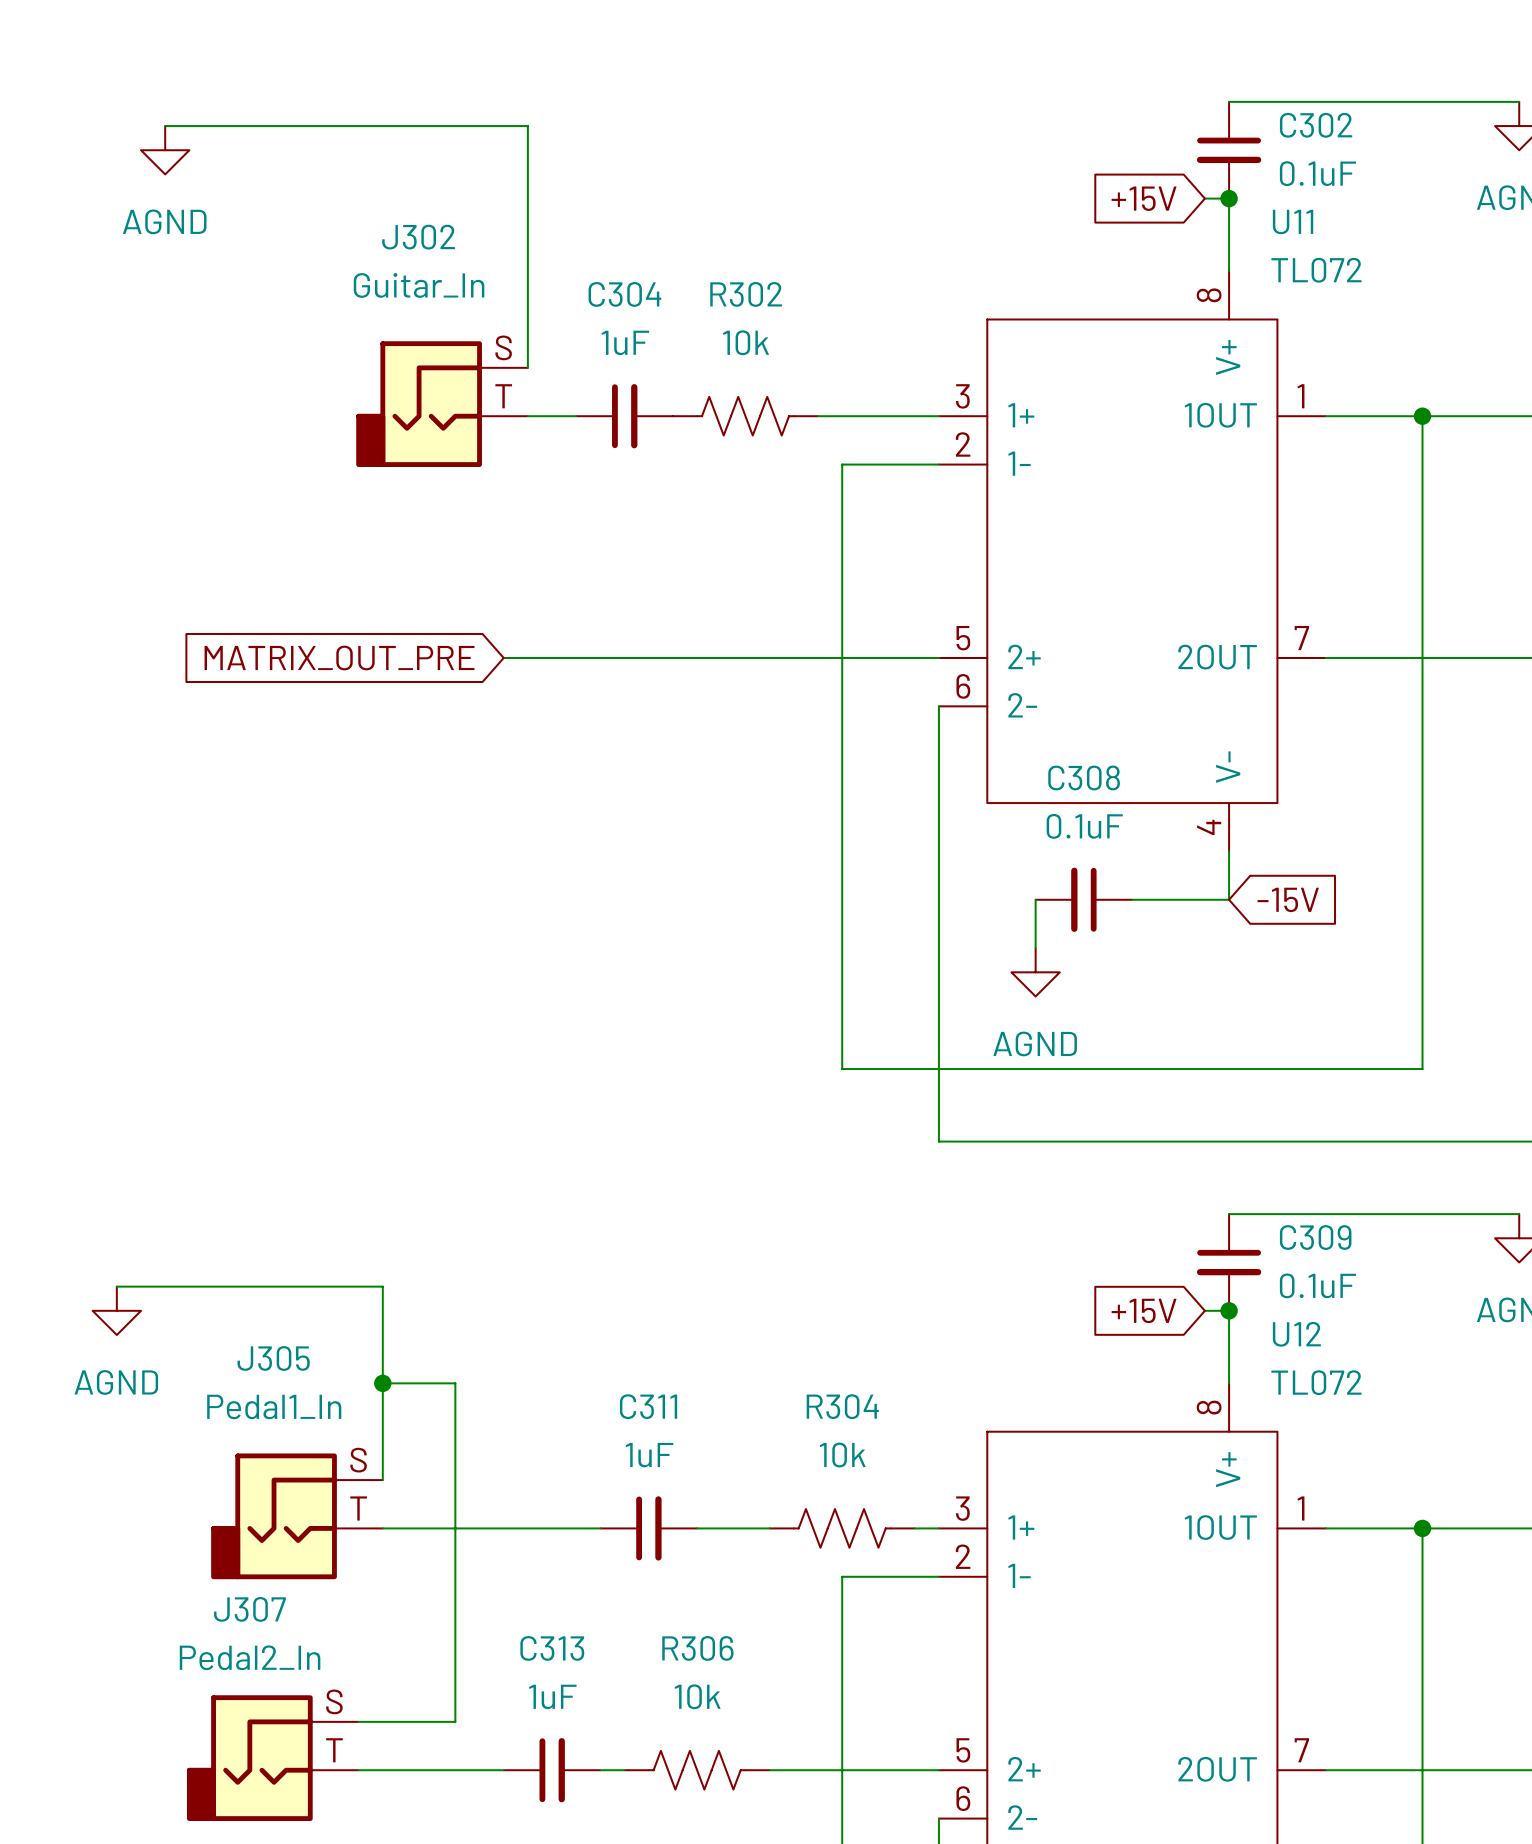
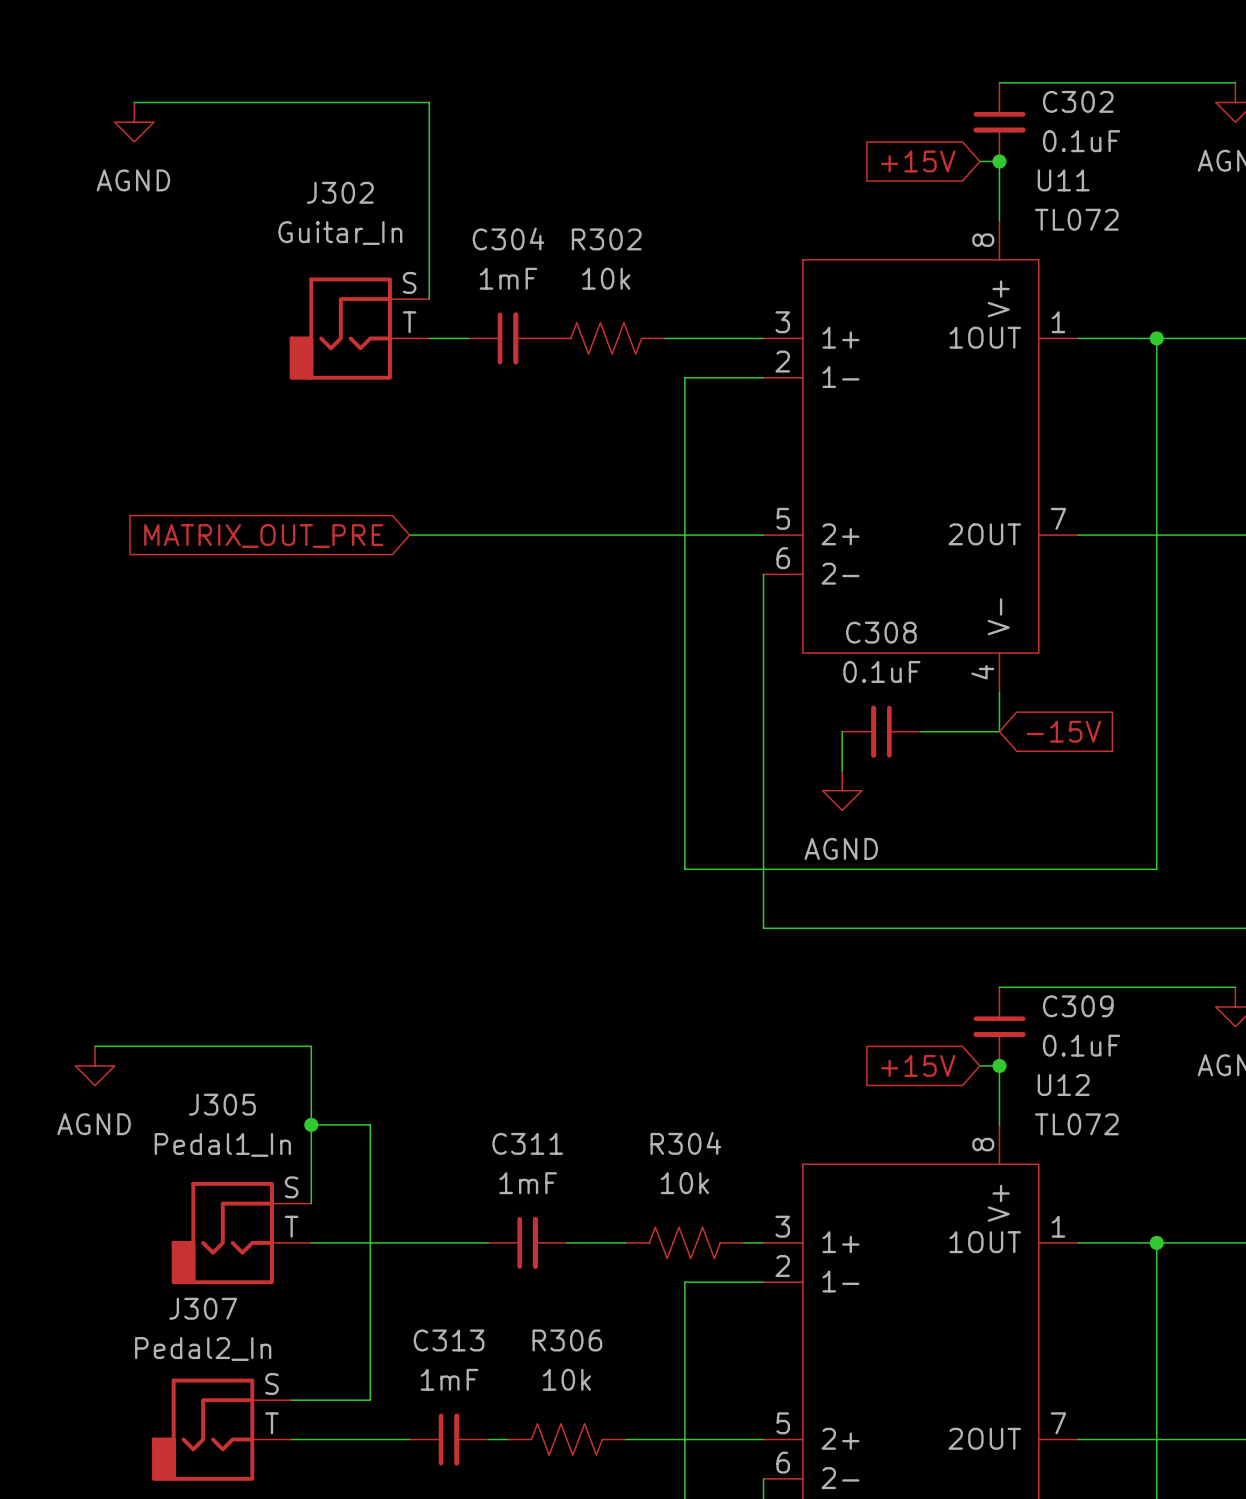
C304 value: 1uF (625, 342) -> 1mF (508, 278)
C311 value: 1uF (649, 1455) -> 1mF (528, 1183)
C313 value: 1uF (552, 1696) -> 1mF (449, 1379)

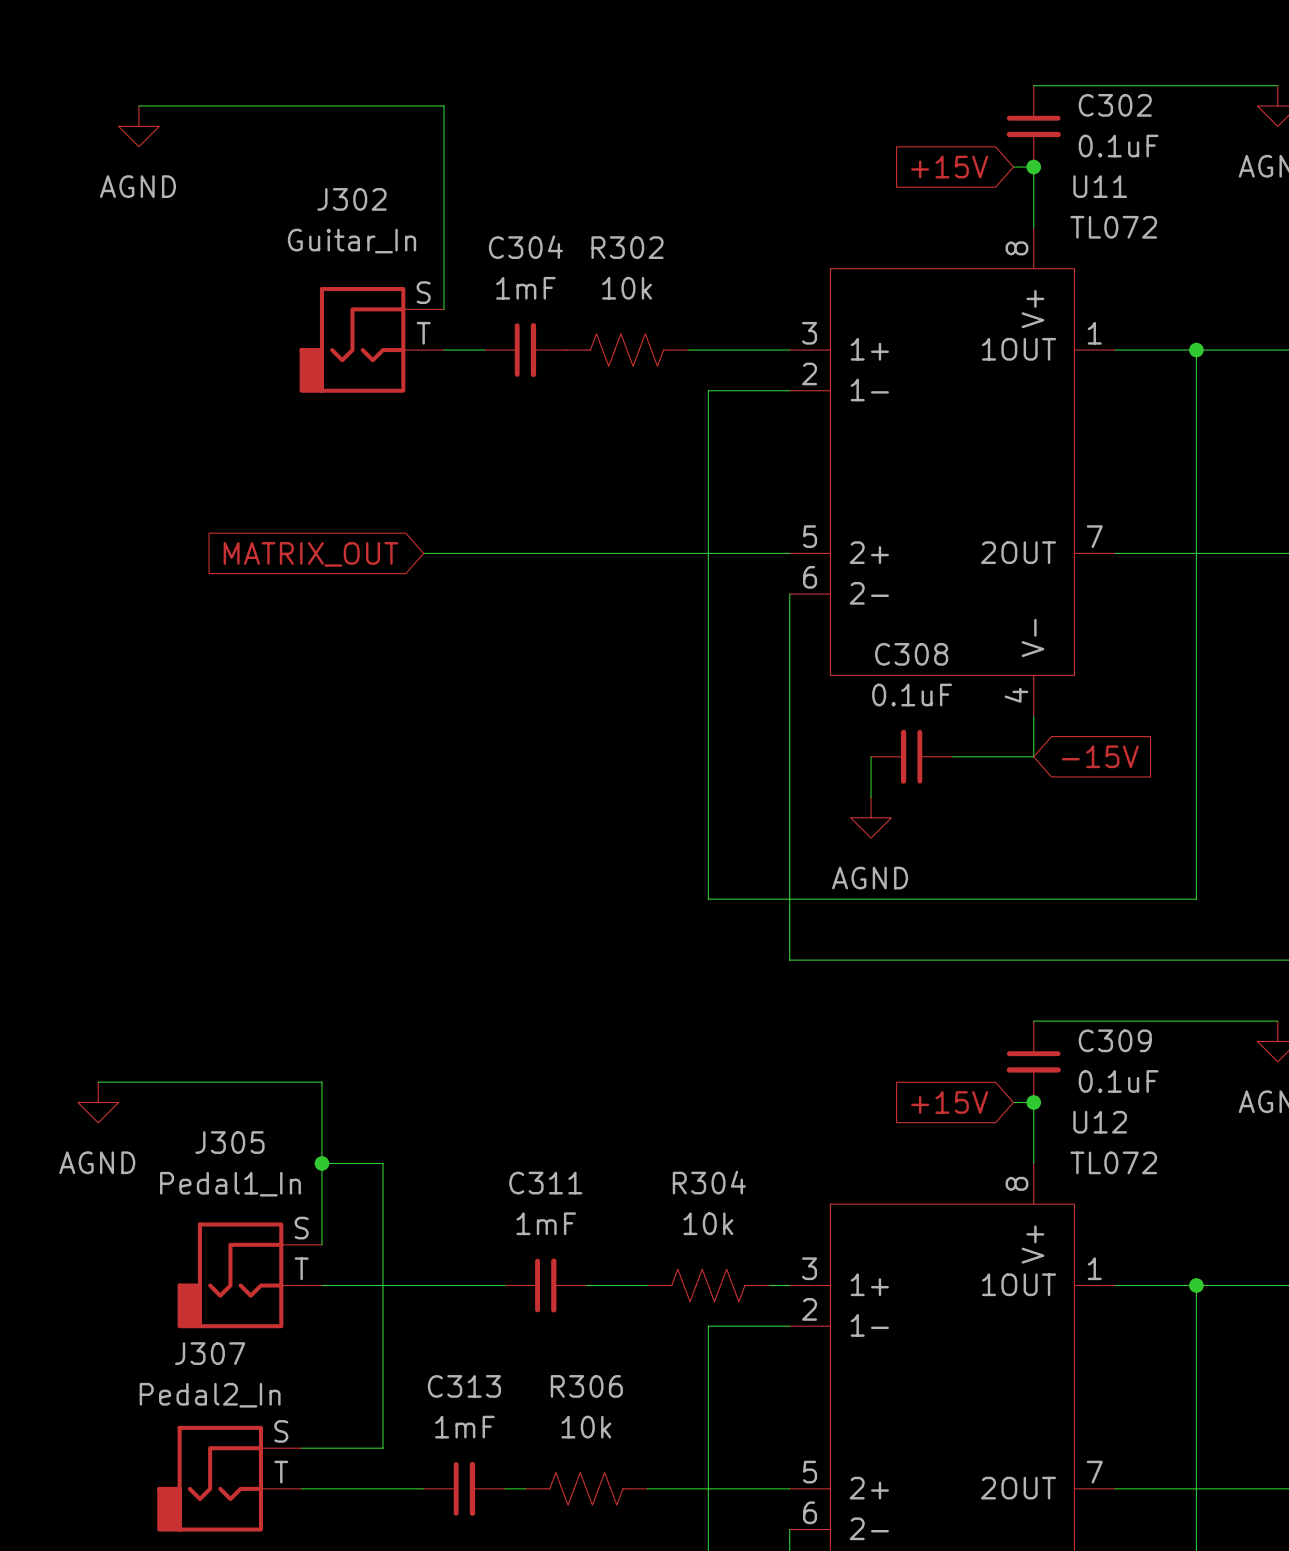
global label: MATRIX_OUT_PRE (263, 536) -> MATRIX_OUT (311, 554)

